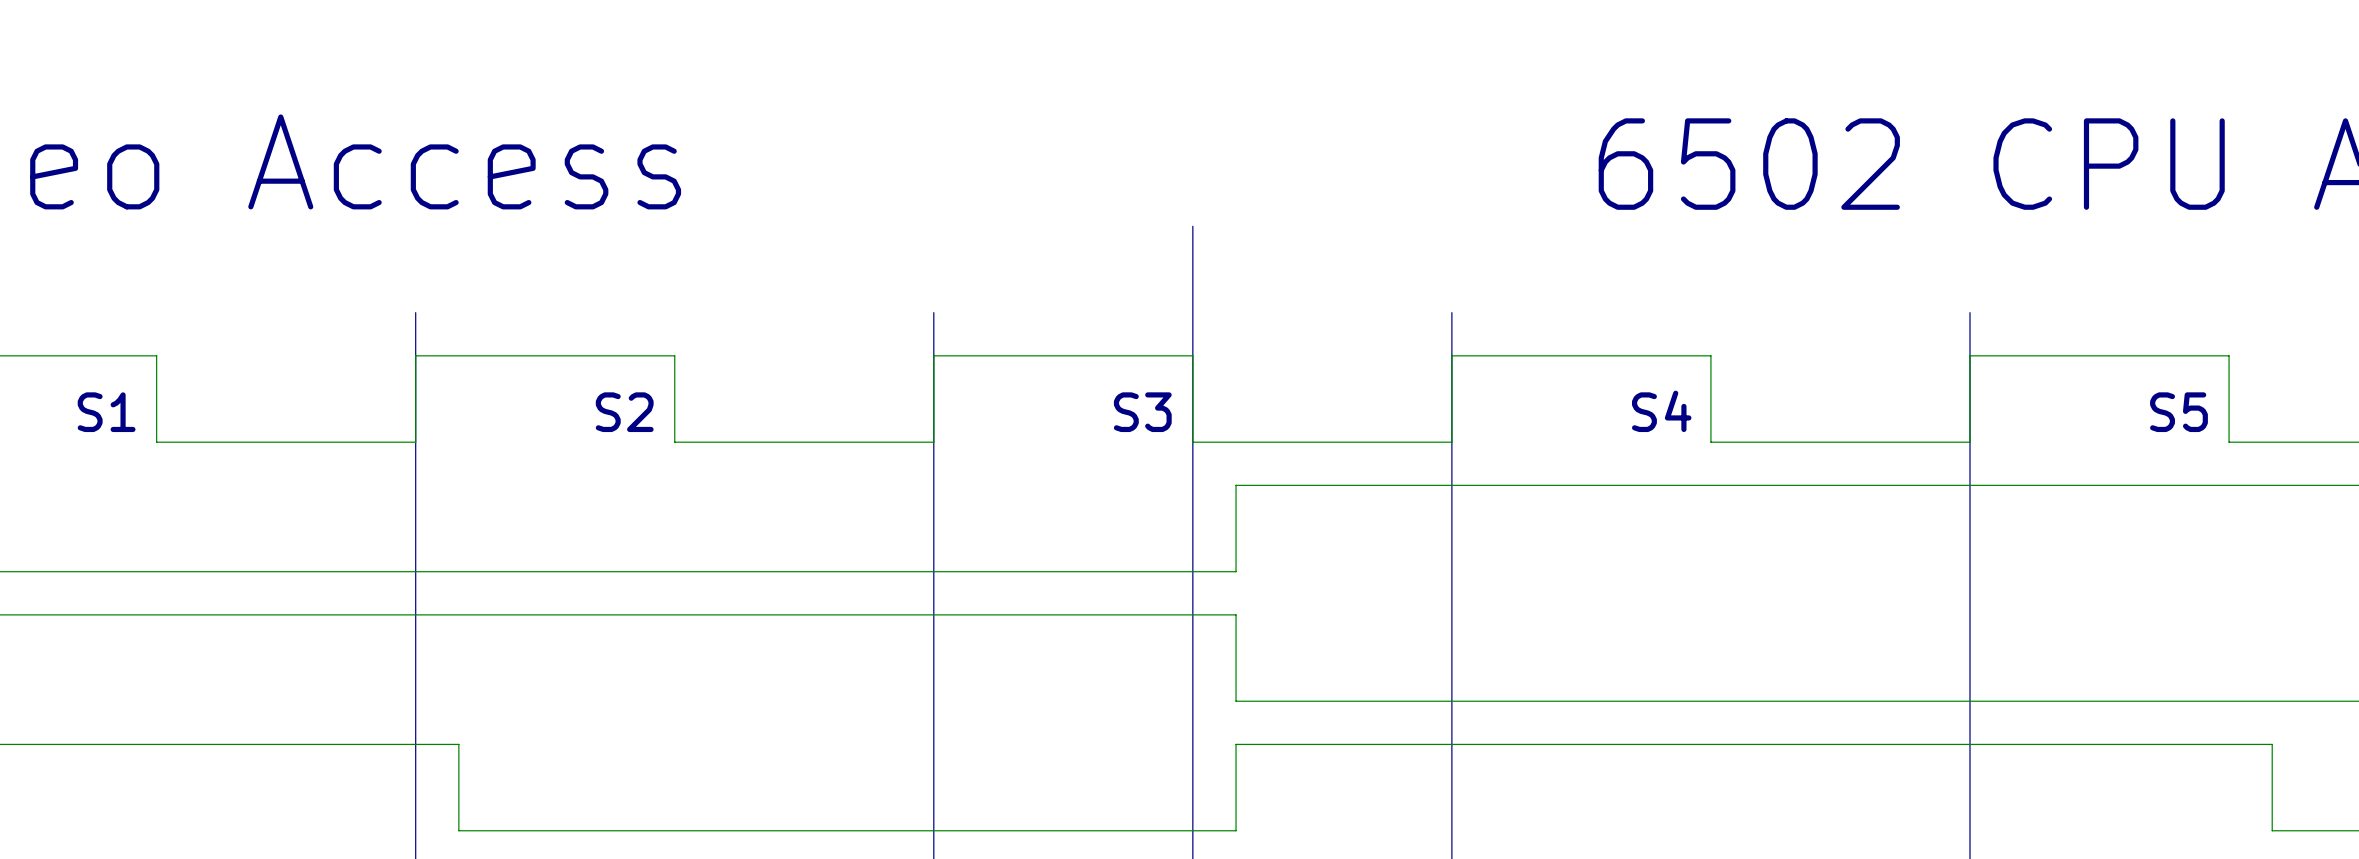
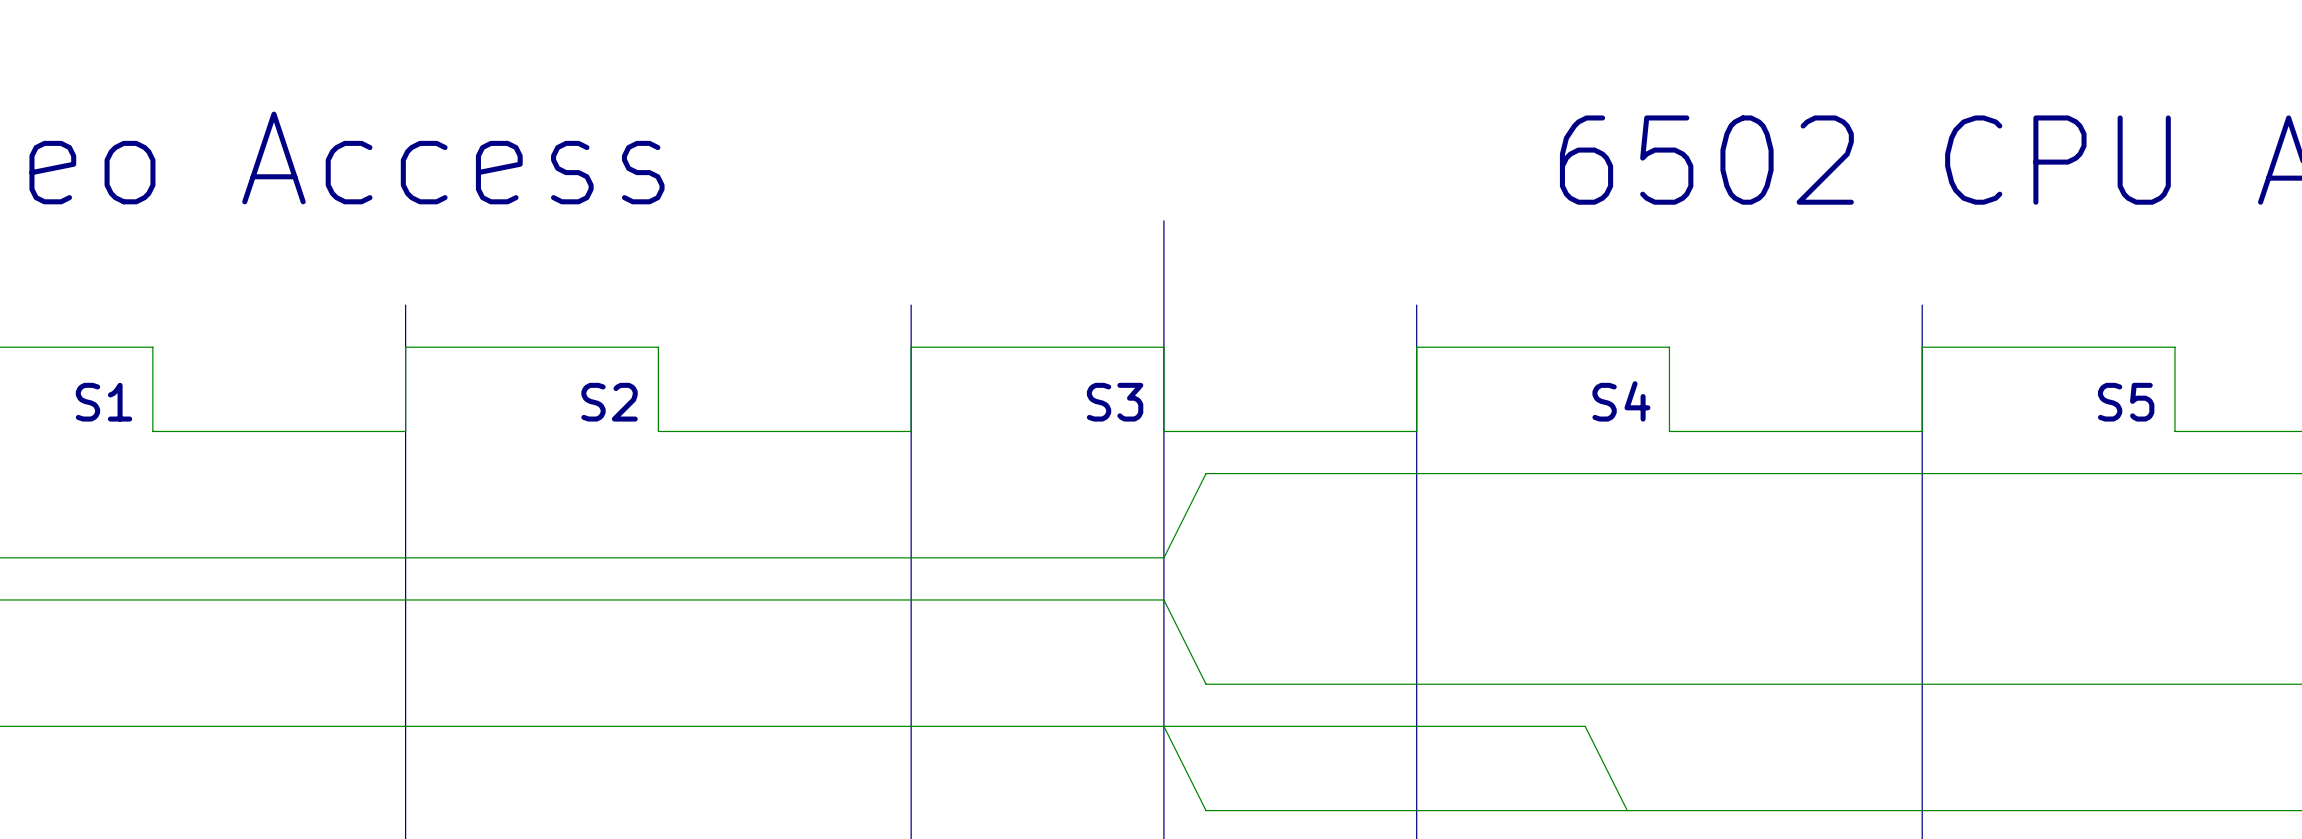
wire: (1236, 485) (1236, 571) (1192, 571) -> (1206, 473) (1163, 557)
wire: (1192, 614) (1236, 614) (1236, 701) -> (1163, 599) (1206, 684)
wire: (458, 744) (458, 830) (1236, 830) (1236, 744) -> (447, 726) (1206, 726)
wire: (1624, 744) (2272, 744) (2272, 830) -> (1163, 726) (1206, 810) (2217, 810)
wire: none -> (1585, 726) (1627, 810)

